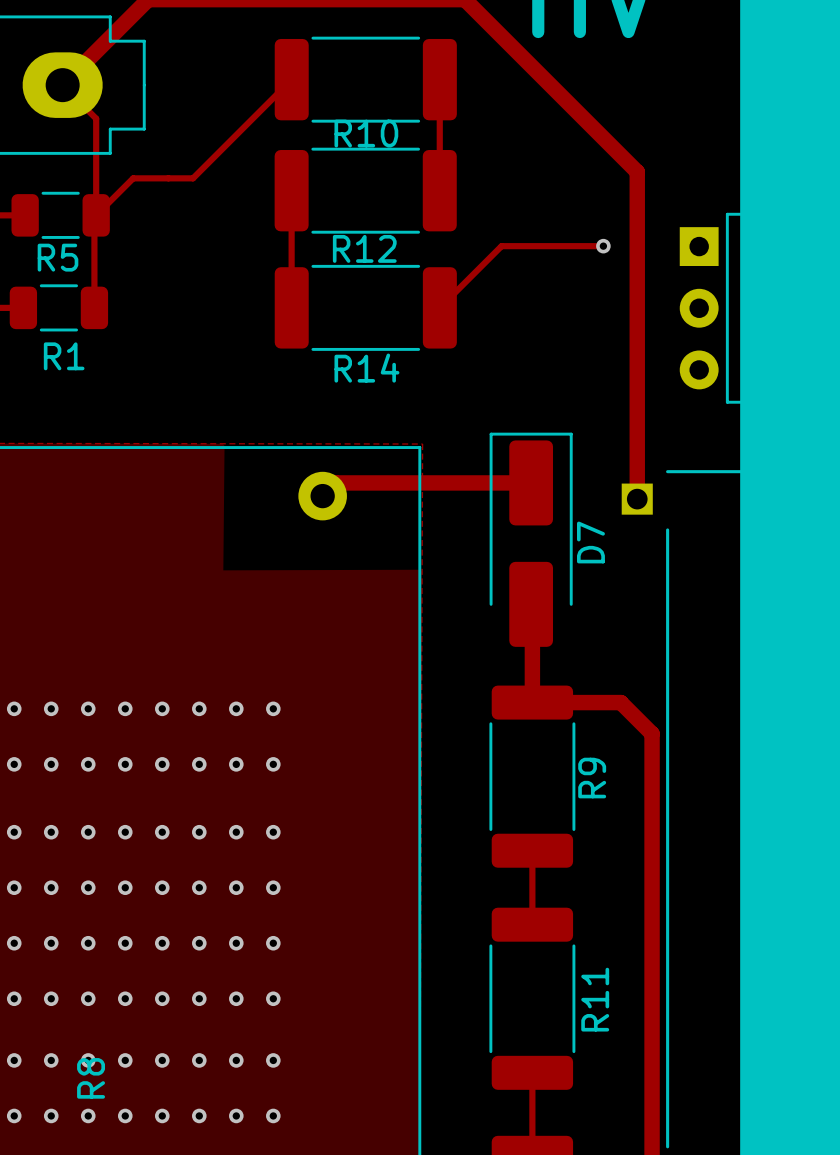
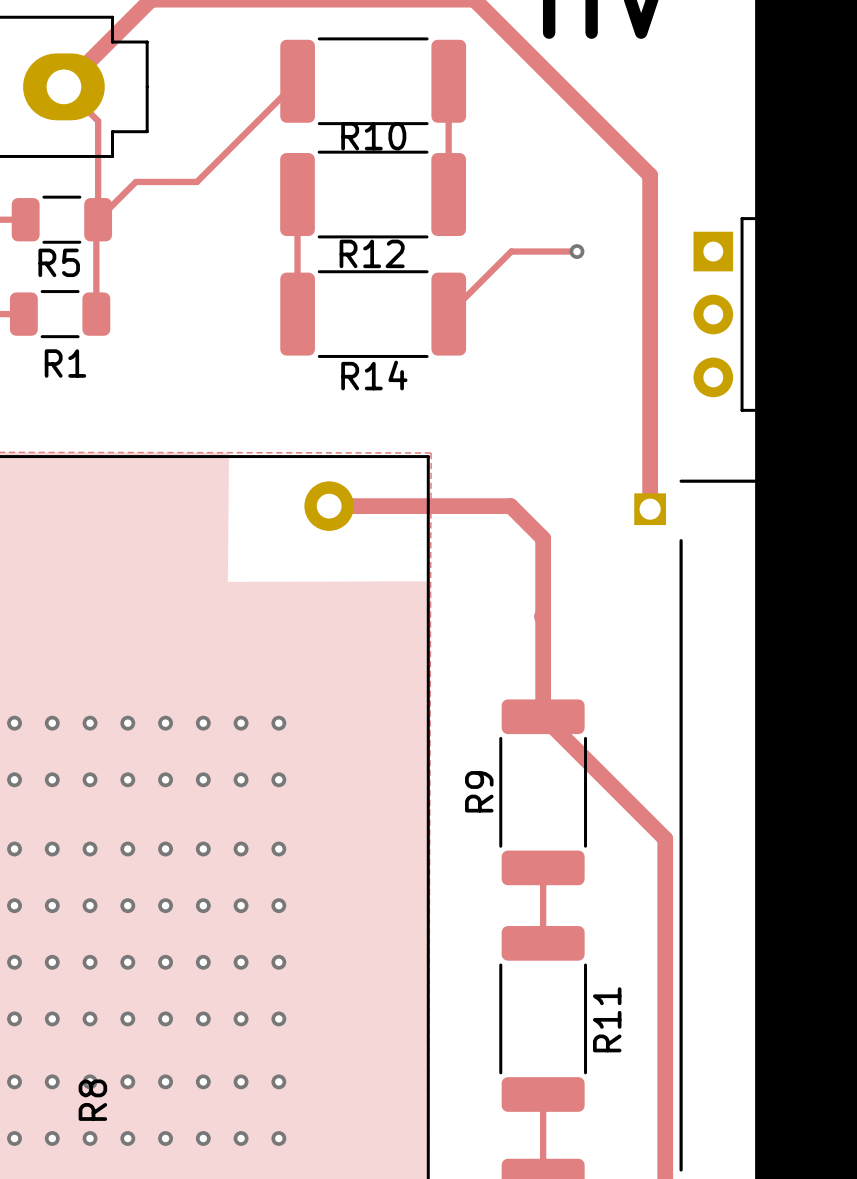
track: (603, 246) (501, 246) -> (576, 251) (511, 251)
via position: (603, 246) -> (576, 251)
track: (531, 482) (335, 482) (322, 496) -> (543, 617) (543, 538) (510, 506) (329, 506)
D7: (531, 539) -> none
track: (532, 702) (620, 702) (652, 733) (652, 822) -> (543, 716) (665, 838)
R9 name position: R9 (592, 778) -> R9 (479, 791)

